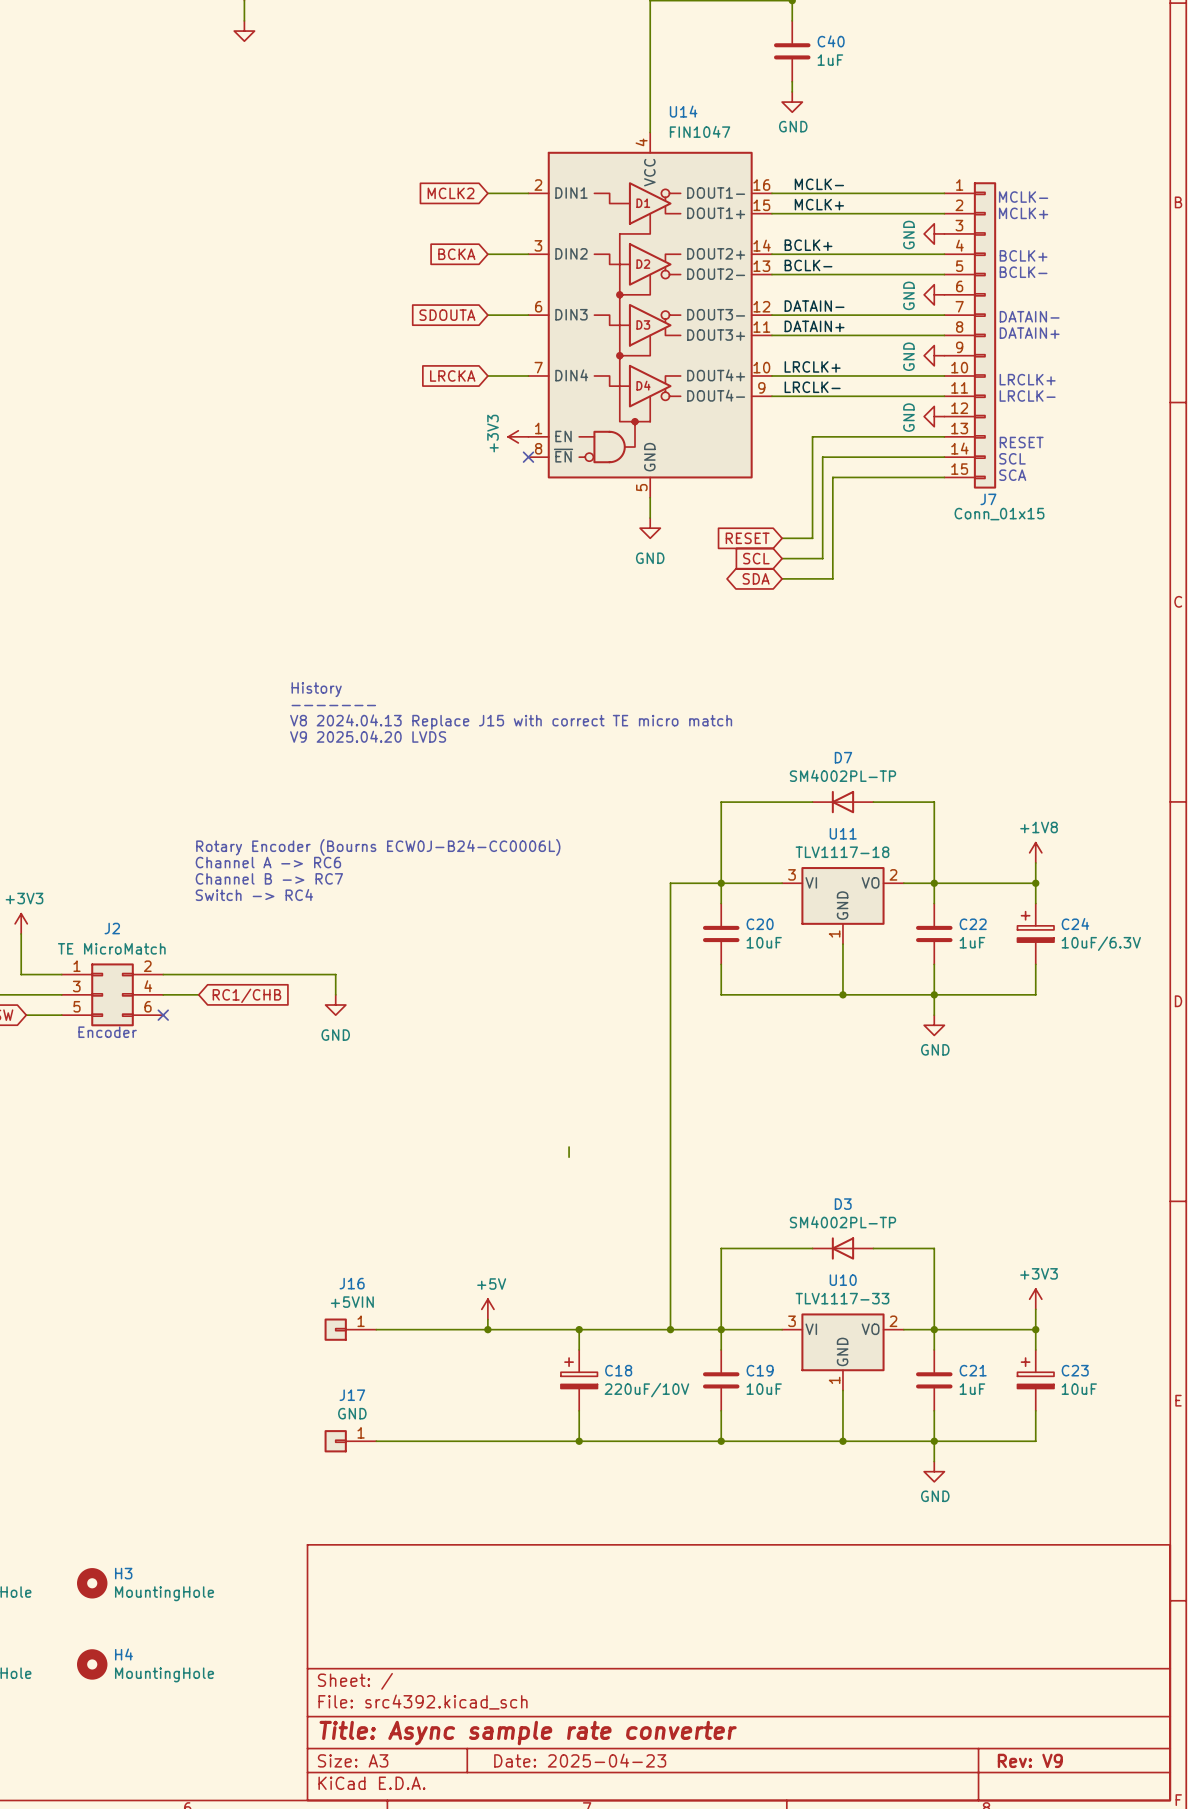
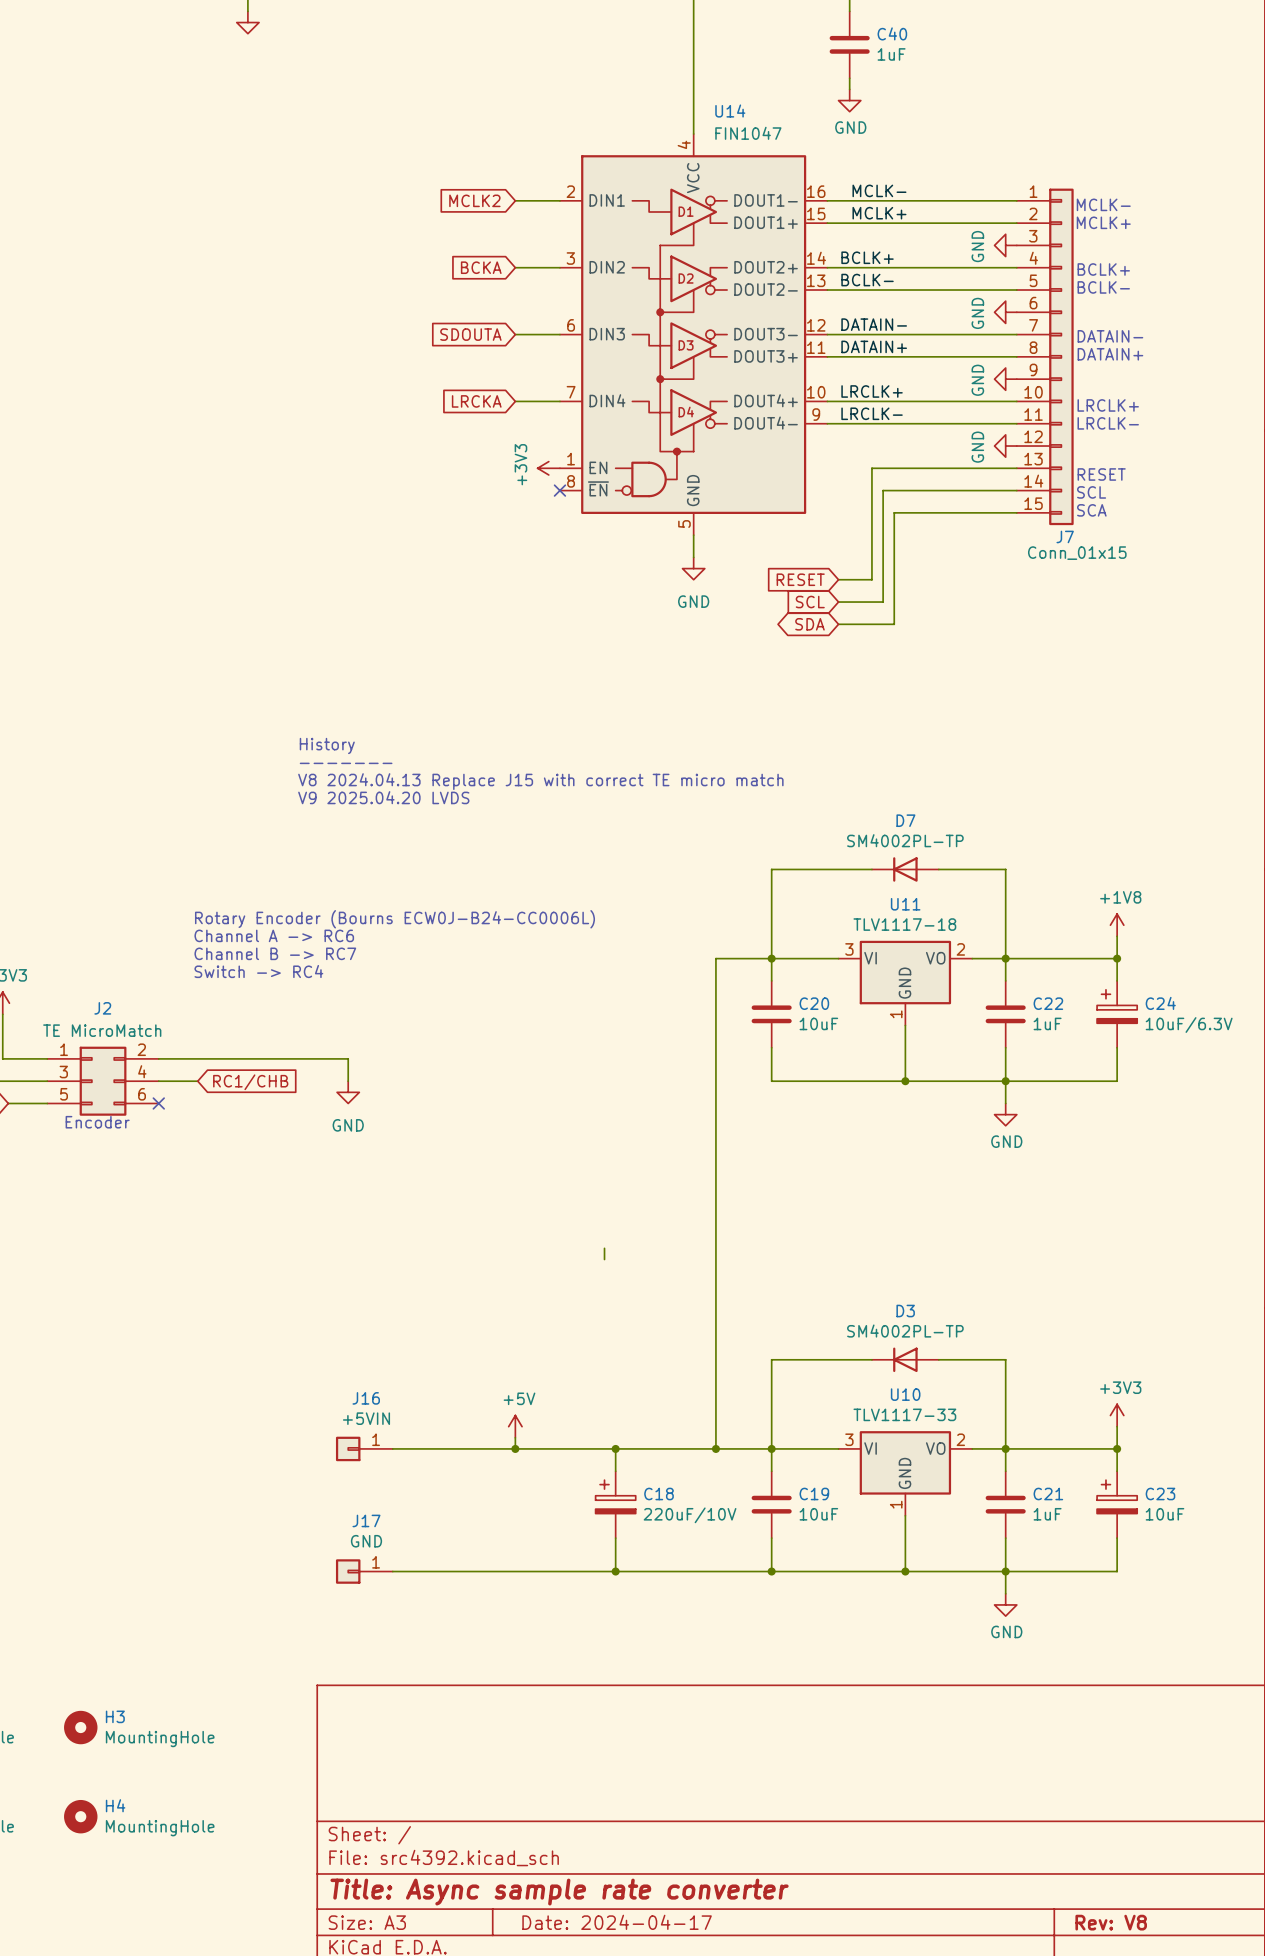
title block: Date: 2025-04-23 (580, 1760) -> Date: 2024-04-17 (617, 1922)
title block: Rev: V9 (1030, 1760) -> Rev: V8 (1111, 1922)

